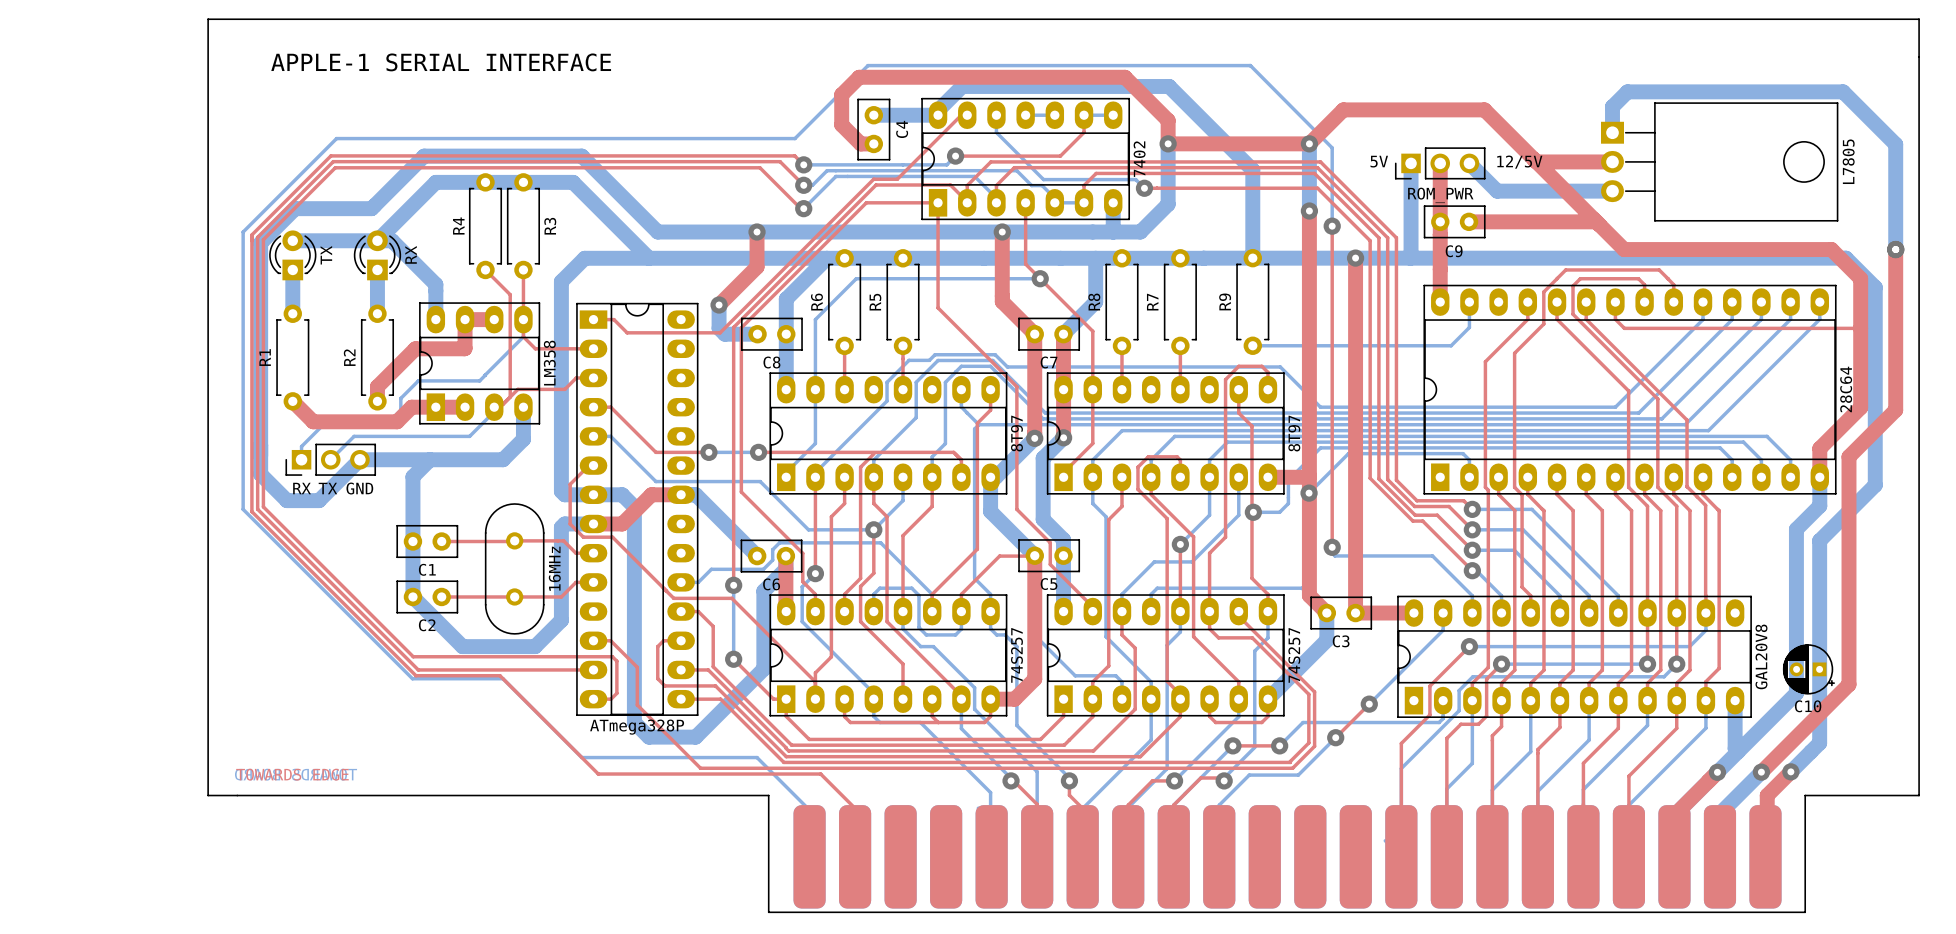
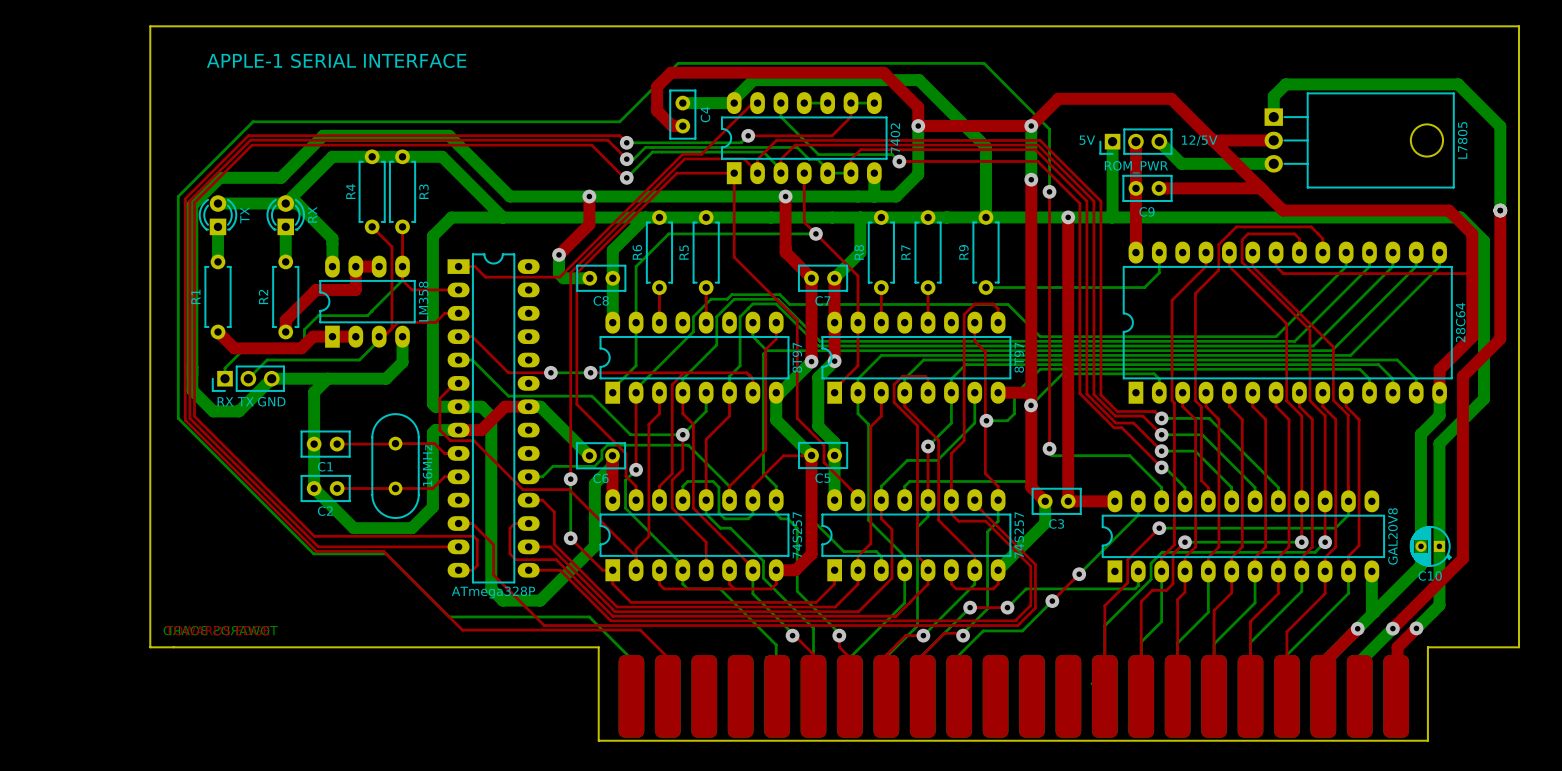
part footprint: [921, 97, 1130, 221] -> [721, 92, 888, 185]
part footprint: [1423, 284, 1837, 495] -> [1123, 241, 1453, 404]
part footprint: [419, 302, 541, 425] -> [319, 255, 416, 348]
part footprint: [576, 302, 699, 716] -> [447, 253, 540, 584]
part footprint: [769, 372, 1008, 495] -> [599, 311, 790, 404]
part footprint: [1046, 372, 1285, 495] -> [821, 311, 1011, 404]
part footprint: [769, 594, 1008, 717] -> [599, 489, 790, 582]
part footprint: [1046, 594, 1285, 717] -> [821, 489, 1011, 582]
part footprint: [1397, 595, 1752, 718] -> [1102, 490, 1385, 583]

